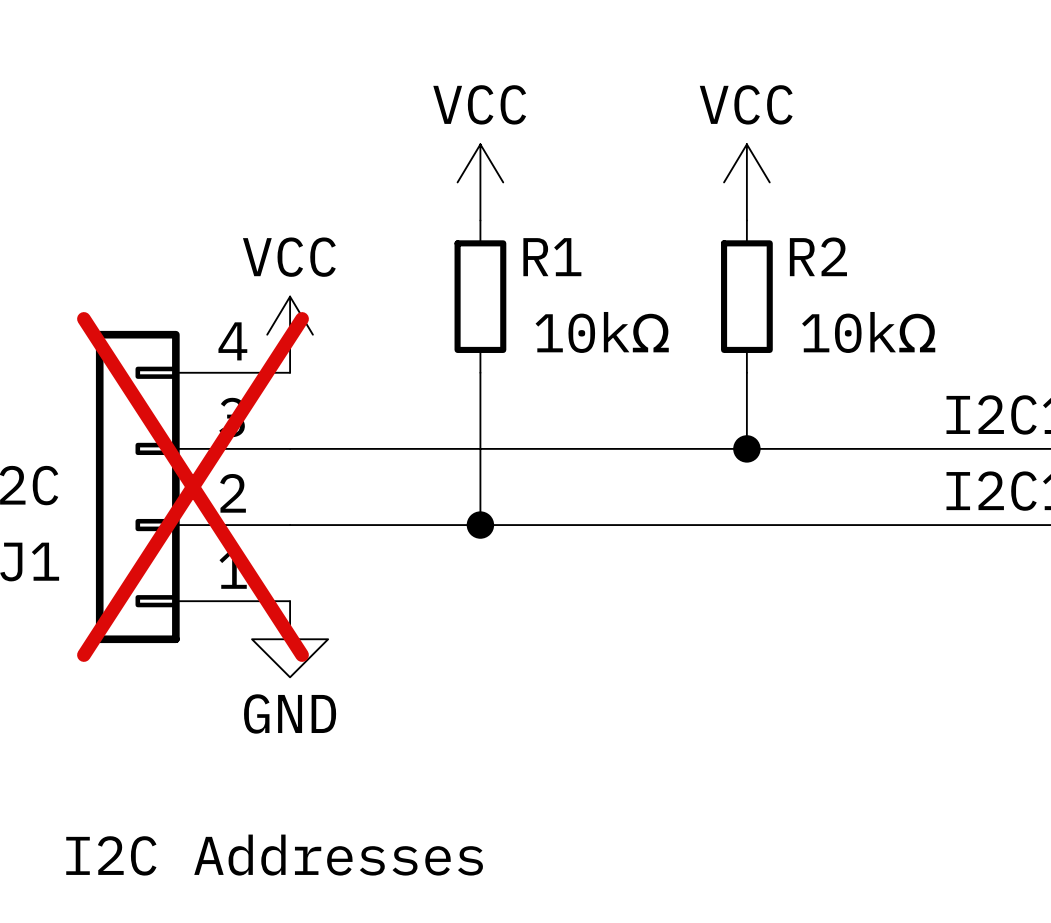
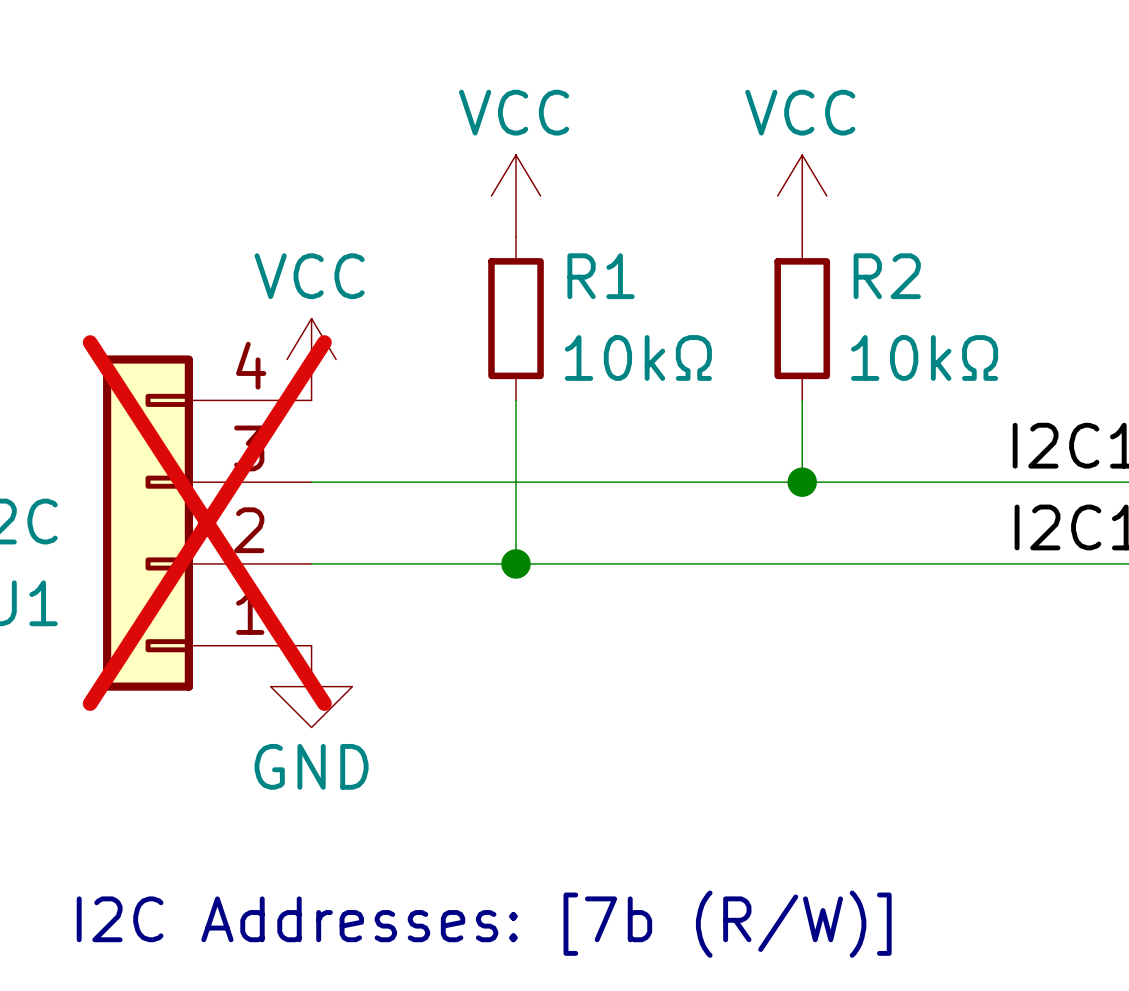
text: I2C Addresses (274, 855) -> I2C Addresses: [7b (R/W)] (484, 924)

